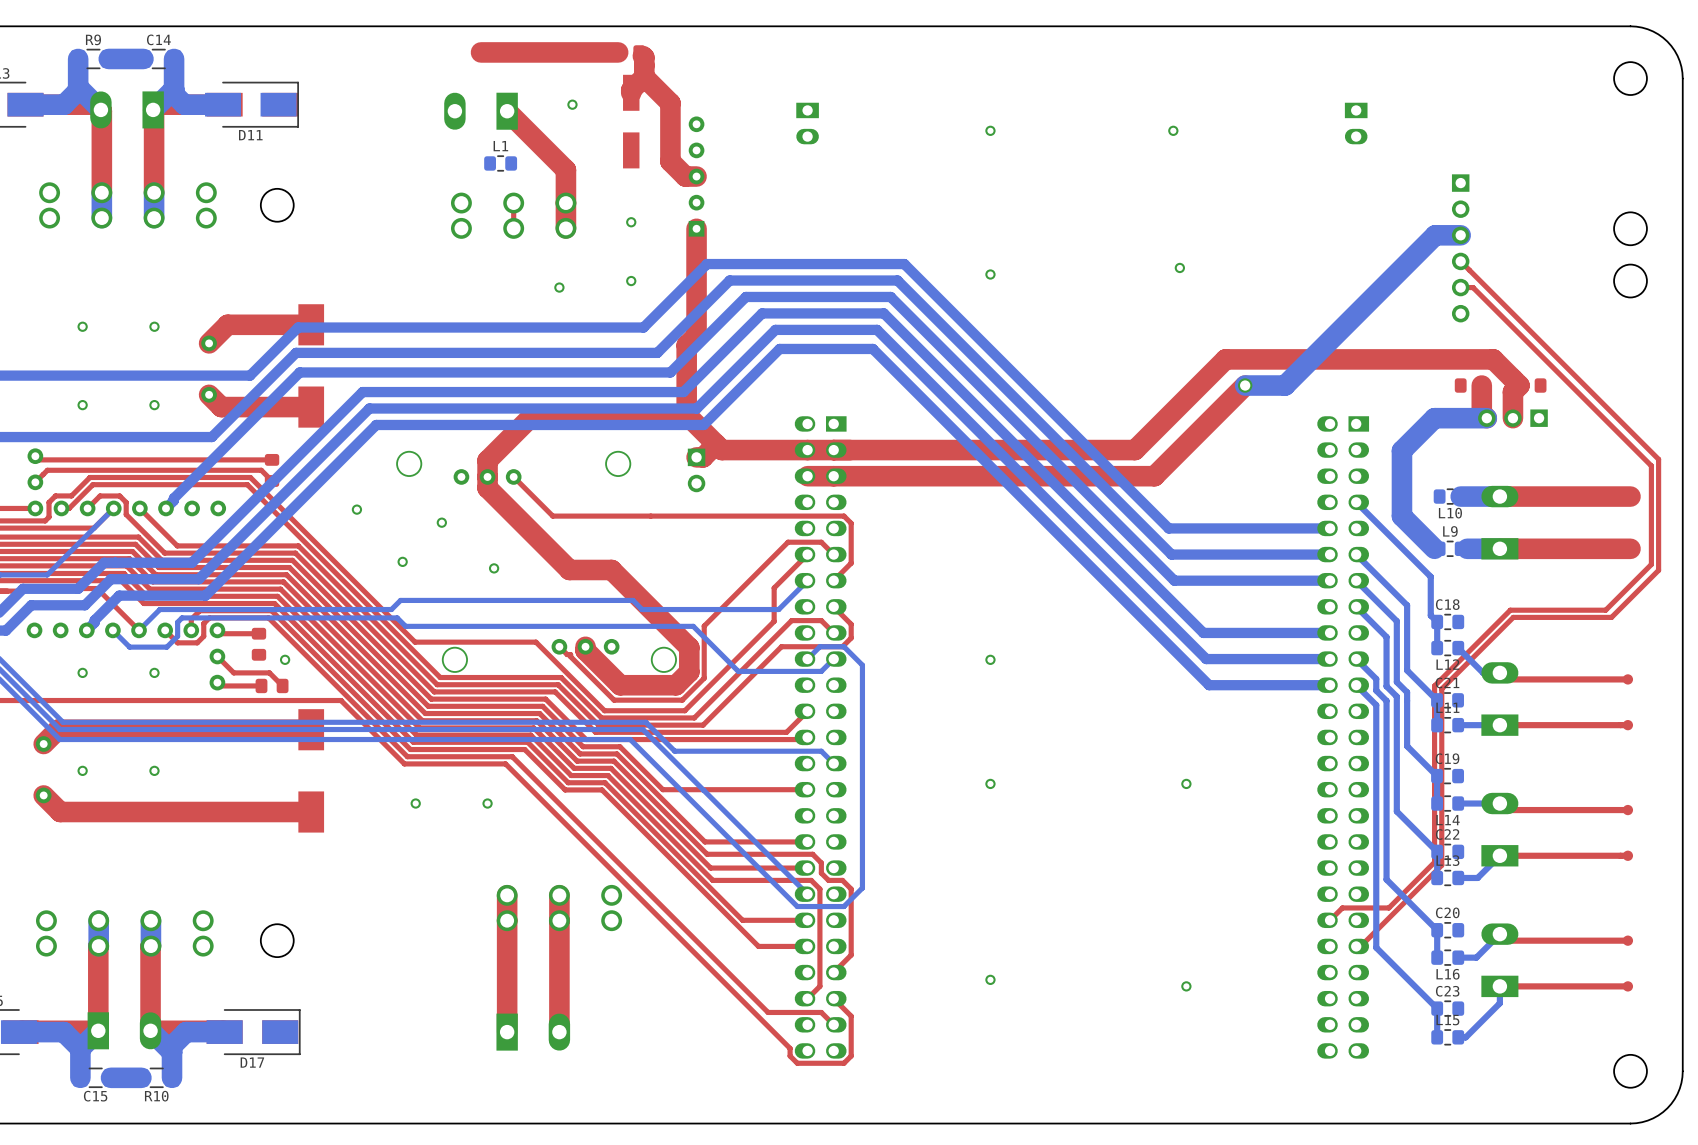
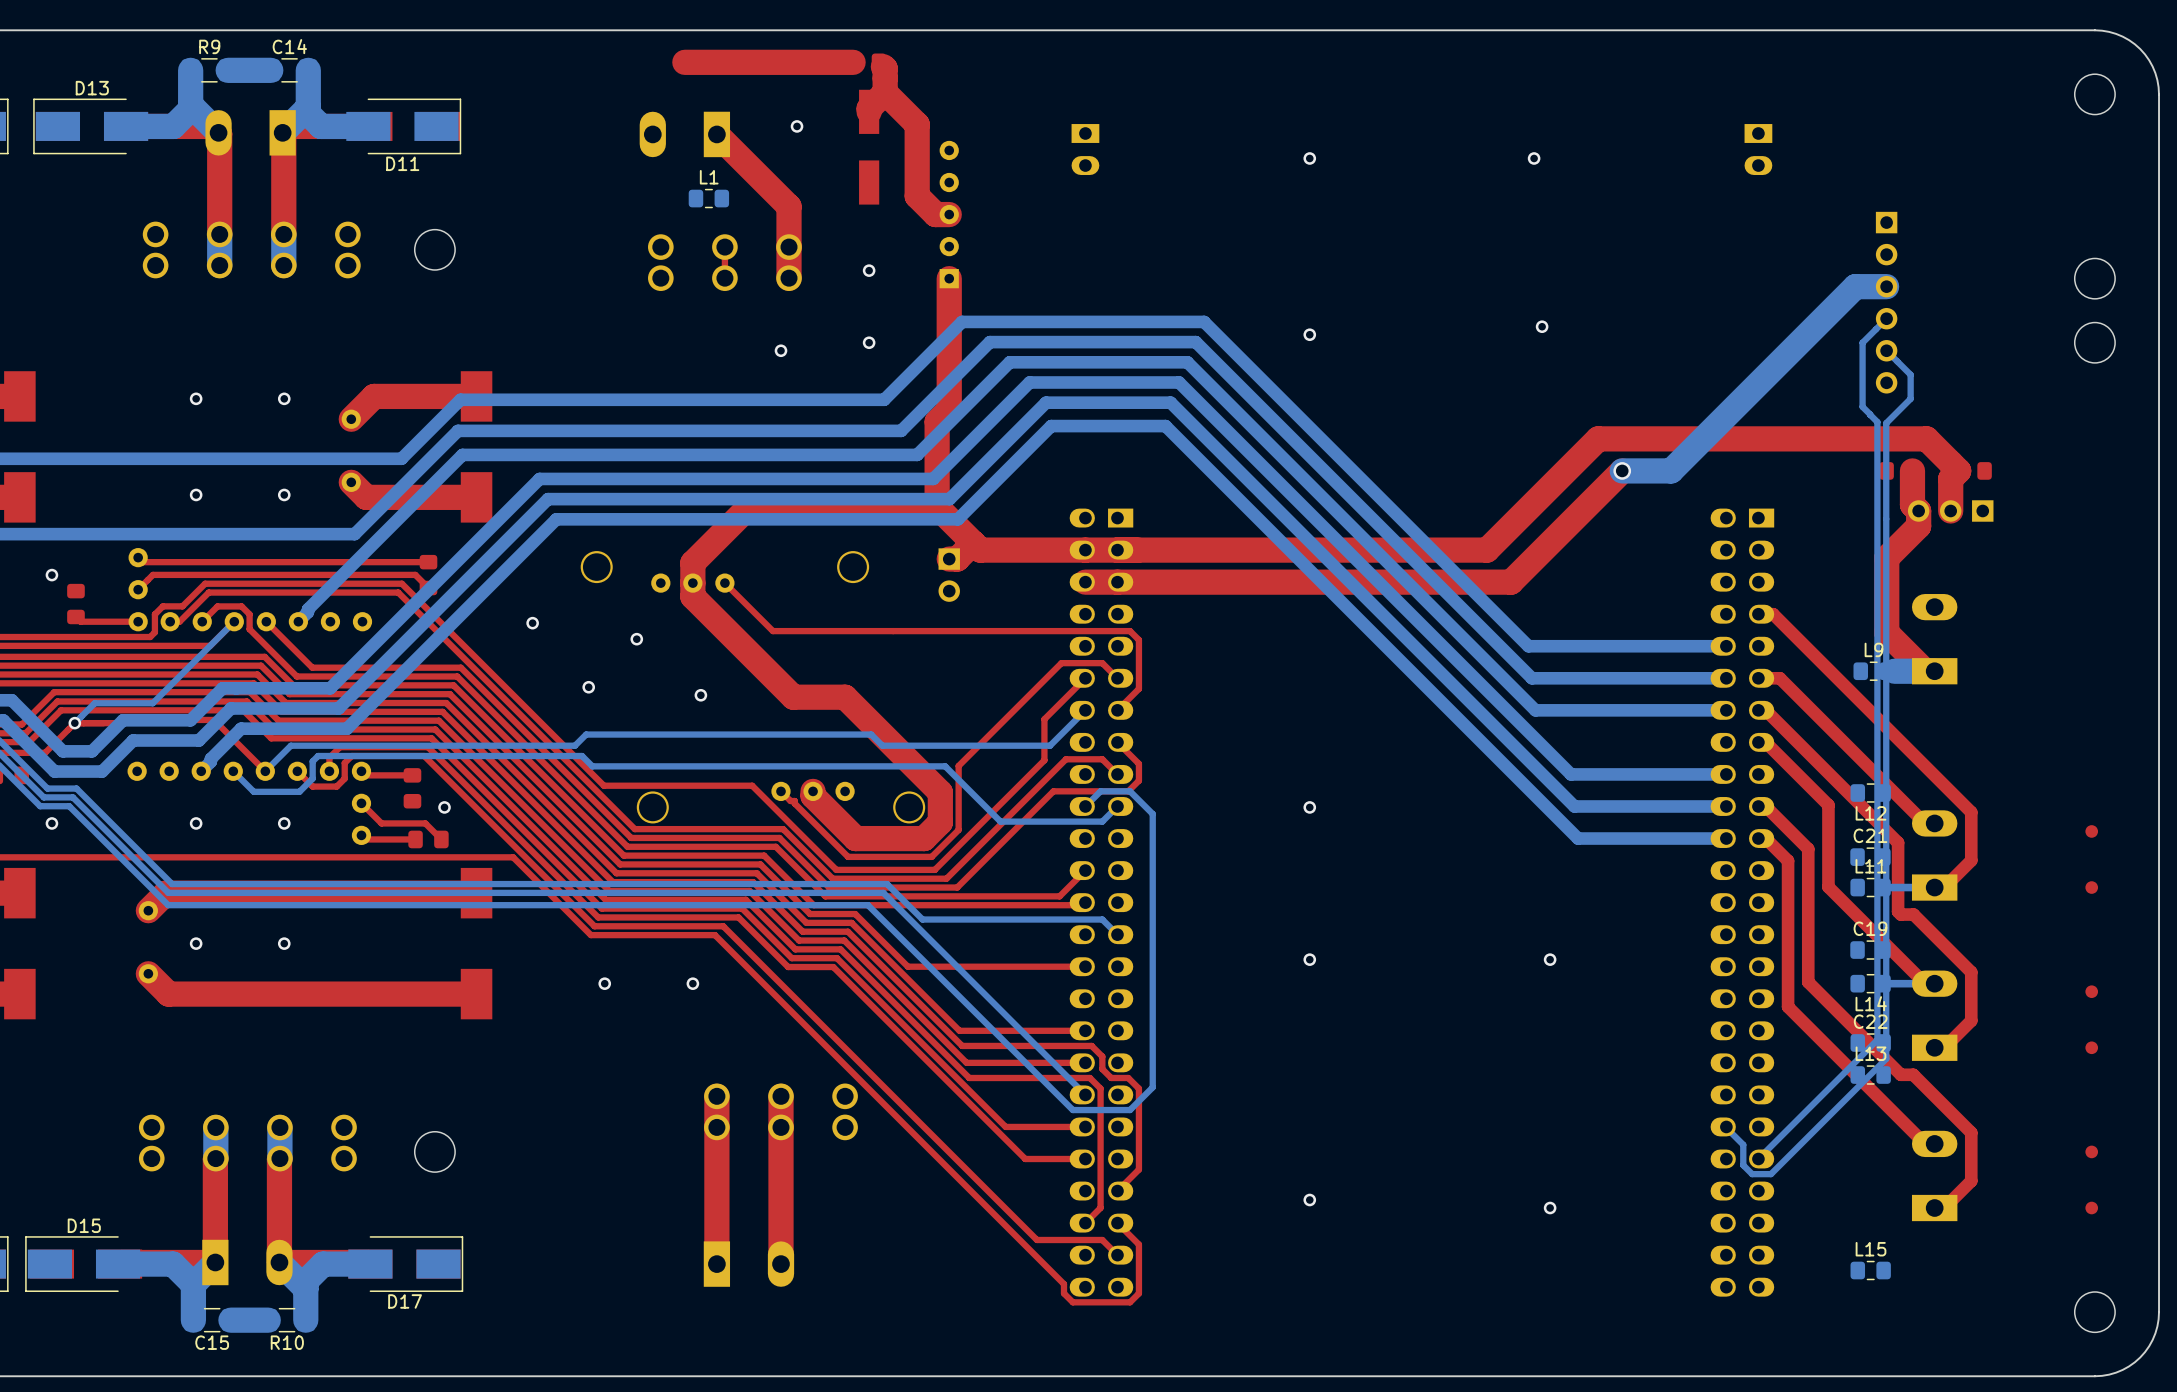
top track: (1460, 261) (1658, 459) (1658, 570) (1611, 617) (1513, 617) (1441, 688) (1441, 865) (1360, 946) (1356, 946) -> none
bottom track: none -> (1886, 318) (1862, 342) (1862, 406) (1877, 422) (1877, 1040) (1758, 1158)
top track: (1460, 287) (1473, 287) (1651, 465) (1651, 564) (1605, 610) (1510, 610) (1434, 685) (1434, 862) (1388, 907) (1342, 907) (1330, 920) -> none
bottom track: none -> (1886, 350) (1910, 374) (1910, 398) (1886, 423) (1886, 1058) (1771, 1174) (1752, 1174) (1743, 1165) (1743, 1144) (1726, 1127)
bottom track: (1486, 418) (1434, 418) (1401, 450) (1401, 516) (1434, 548) -> none
L10: (1450, 496) -> none
bottom track: (1499, 496) (1460, 496) -> none
top track: (1630, 496) (1499, 496) -> none
bottom track: (1356, 502) (1430, 576) (1430, 615) (1437, 621) (1437, 648) -> none
top track: (1630, 548) (1499, 548) -> (1918, 510) (1918, 526) (1886, 558) (1886, 632) (1925, 671) (1934, 671)
bottom track: (1356, 554) (1407, 605) (1407, 670) (1437, 700) (1437, 725) -> none
bottom track: (1356, 580) (1396, 621) (1396, 682) (1407, 692) (1407, 746) (1437, 776) (1437, 803) -> none
bottom track: (1356, 606) (1386, 637) (1386, 686) (1396, 696) (1396, 811) (1437, 851) (1437, 877) -> none
C18: (1447, 621) -> none
bottom track: (1458, 648) (1483, 672) (1499, 672) -> none
bottom track: (1356, 659) (1376, 679) (1376, 690) (1386, 700) (1386, 879) (1437, 930) (1437, 957) -> none
top track: (1499, 672) (1506, 679) (1627, 679) -> (1934, 823) (1925, 823) (1779, 678) (1758, 678)
bottom track: (1356, 685) (1376, 705) (1376, 947) (1437, 1008) (1437, 1037) -> none
top track: (1627, 725) (1507, 725) -> (1758, 614) (1773, 614) (1971, 812) (1971, 860) (1944, 887)
top track: (1499, 803) (1506, 810) (1627, 810) -> (1934, 983) (1925, 983) (1828, 887) (1828, 805) (1765, 742) (1758, 742)
bottom track: (1499, 855) (1477, 877) (1458, 877) -> none
top track: (1627, 855) (1507, 855) -> (1758, 710) (1765, 710) (1898, 842) (1898, 911) (1900, 914) (1913, 914) (1971, 972) (1971, 1020) (1944, 1047)
C20: (1447, 930) -> none
top track: (1499, 934) (1506, 940) (1627, 940) -> (1934, 1143) (1925, 1143) (1788, 1006) (1788, 860) (1765, 838) (1758, 838)
bottom track: (1499, 934) (1476, 957) (1458, 957) -> none
L16: (1447, 957) -> none
bottom track: (1499, 986) (1499, 1003) (1465, 1037) (1458, 1037) -> none
top track: (1627, 986) (1507, 986) -> (1758, 806) (1765, 806) (1808, 849) (1808, 982) (1900, 1074) (1913, 1074) (1971, 1132) (1971, 1181) (1944, 1208)
C23: (1447, 1008) -> none

